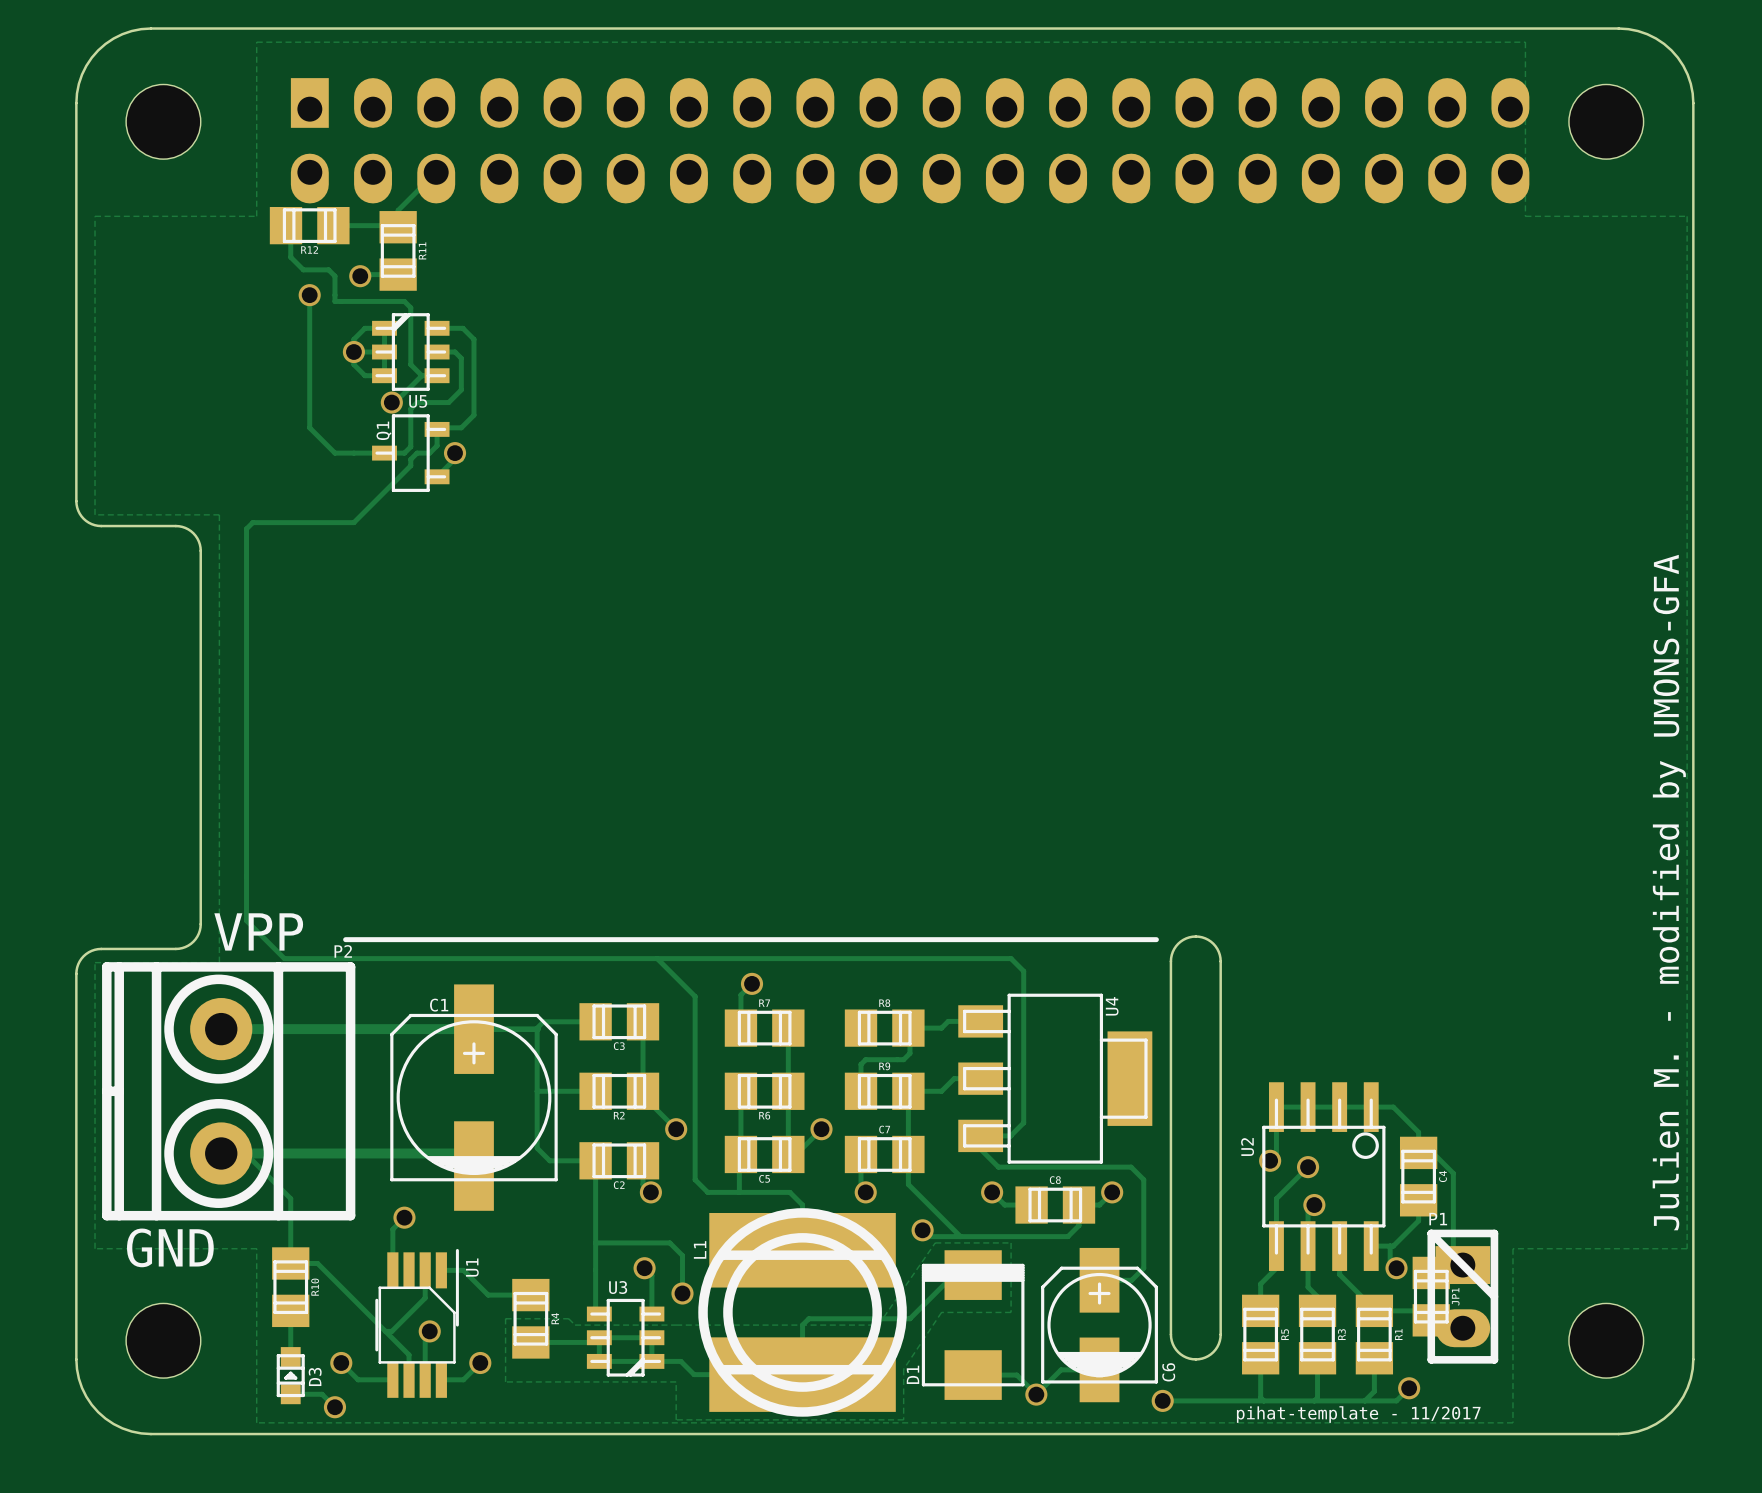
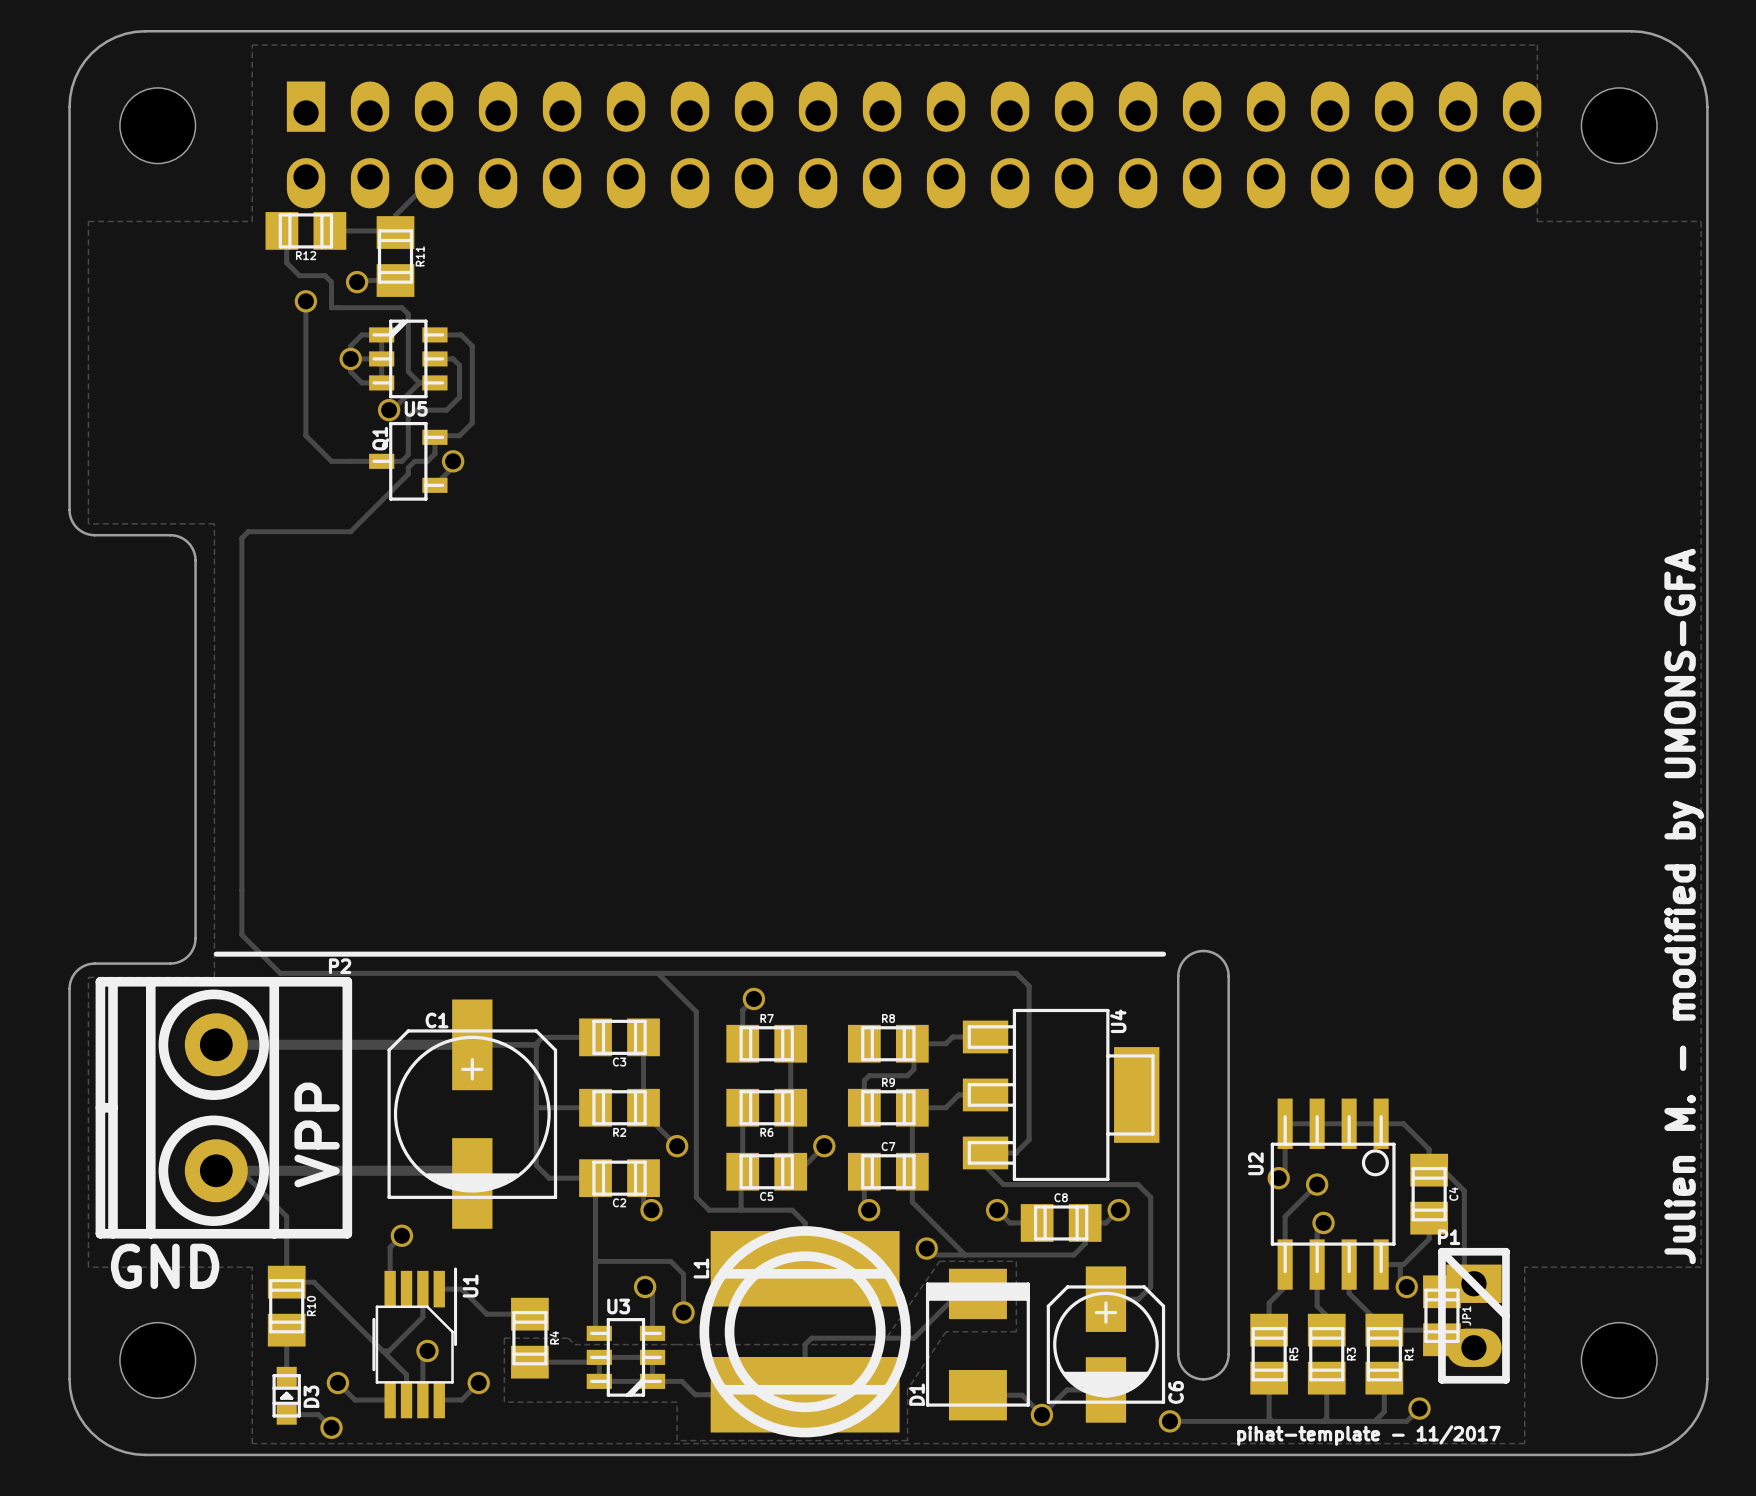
text rotation: 0° (258, 931) -> 90° counterclockwise (317, 1134)
text position: VPP (258, 931) -> VPP (317, 1134)
line: none -> (216, 954) (342, 954)

